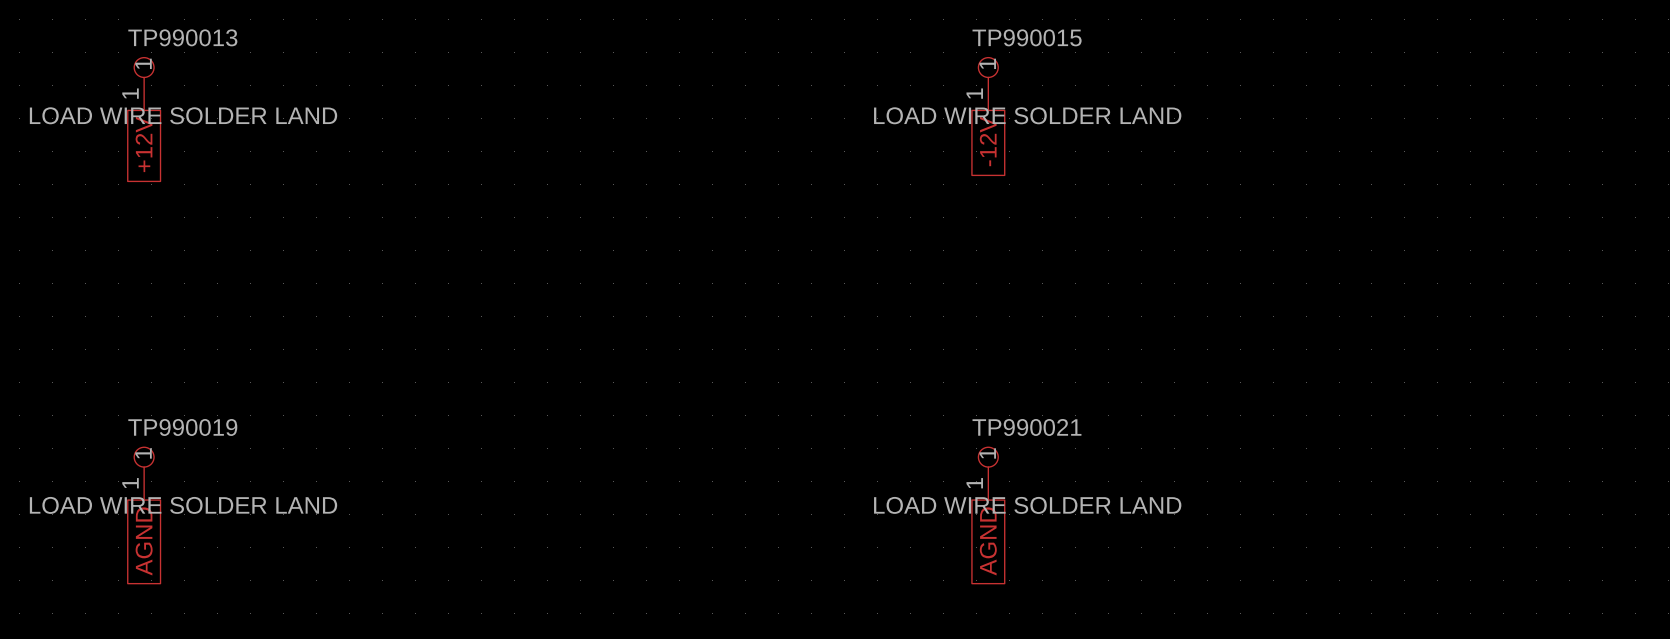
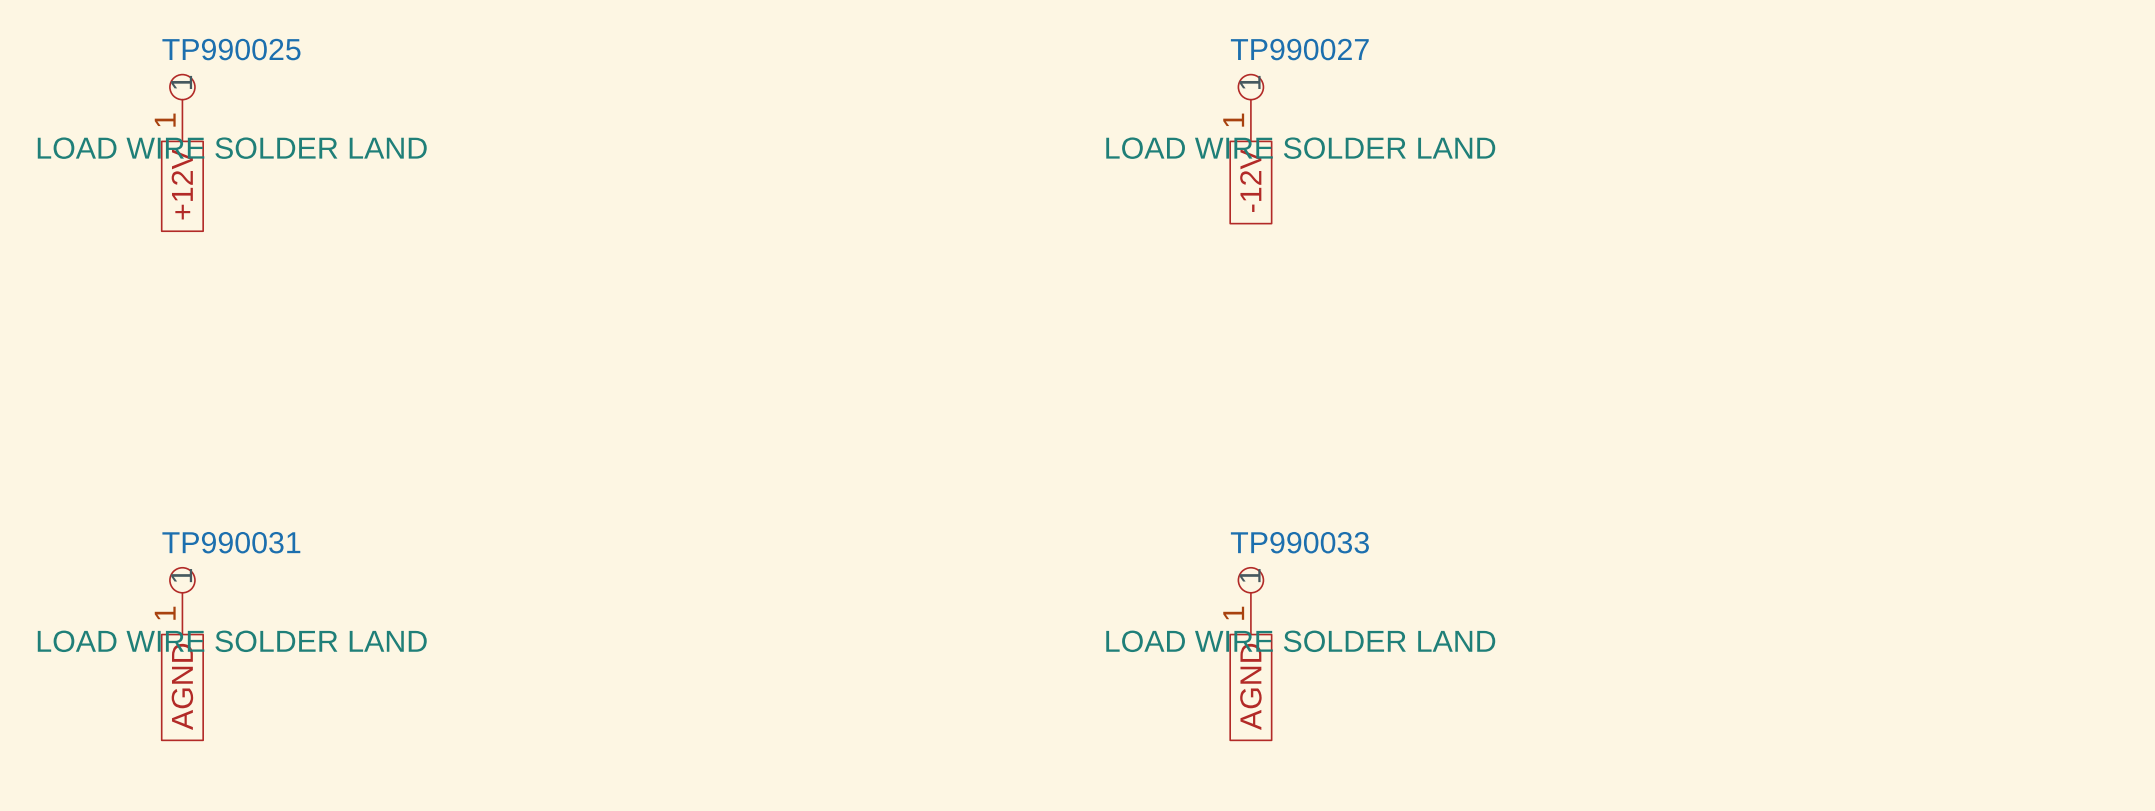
TP990013 name: TP990013 (182, 37) -> TP990025 (231, 49)
TP990015 name: TP990015 (1027, 37) -> TP990027 (1299, 49)
TP990019 name: TP990019 (182, 427) -> TP990031 (231, 542)
TP990021 name: TP990021 (1026, 427) -> TP990033 (1299, 542)

